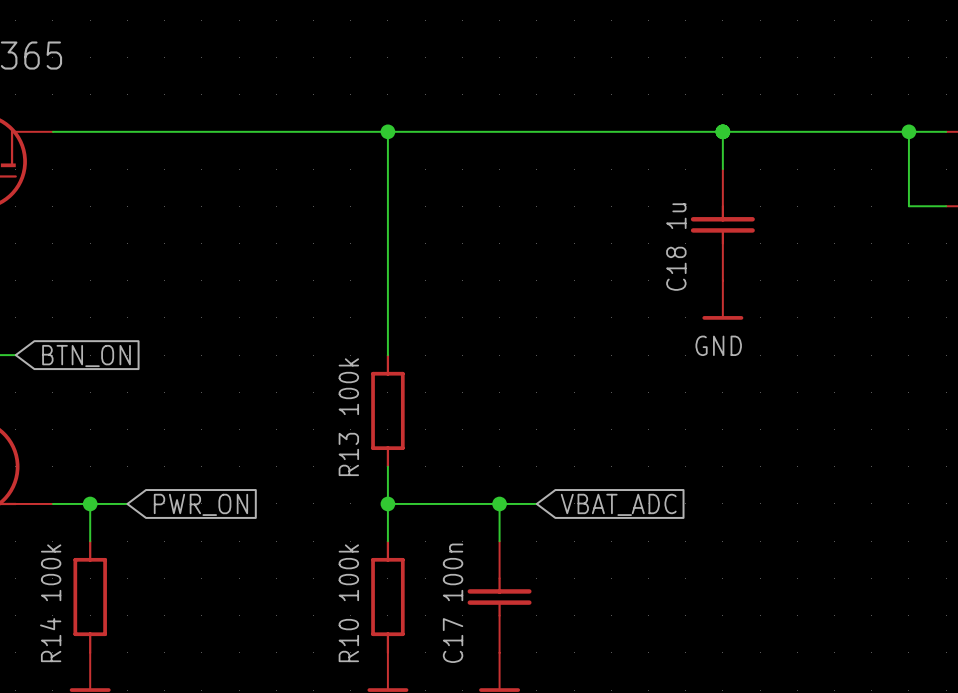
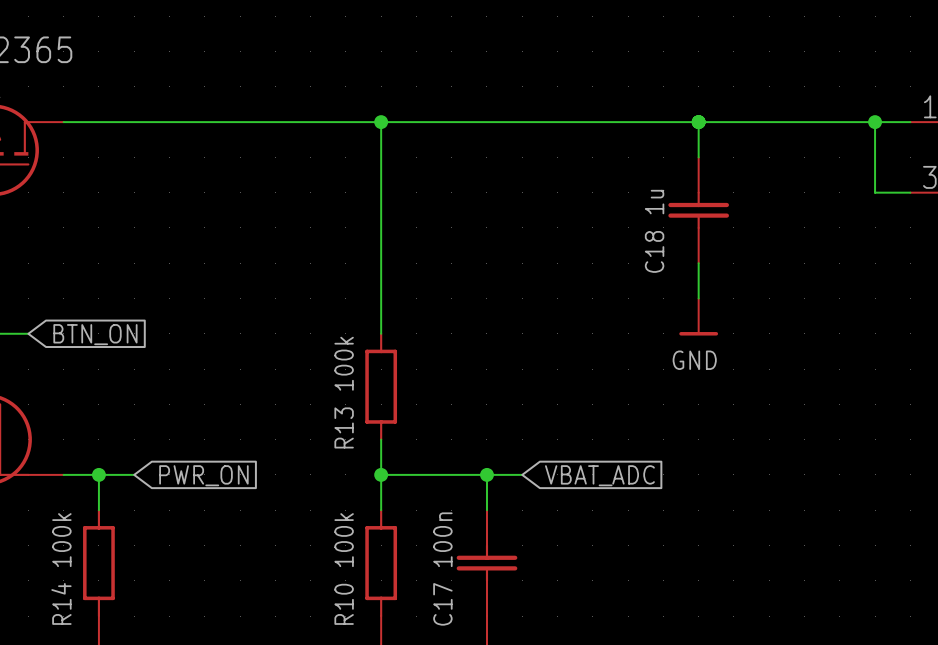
power symbol position: GND (722, 300) -> GND (698, 317)

